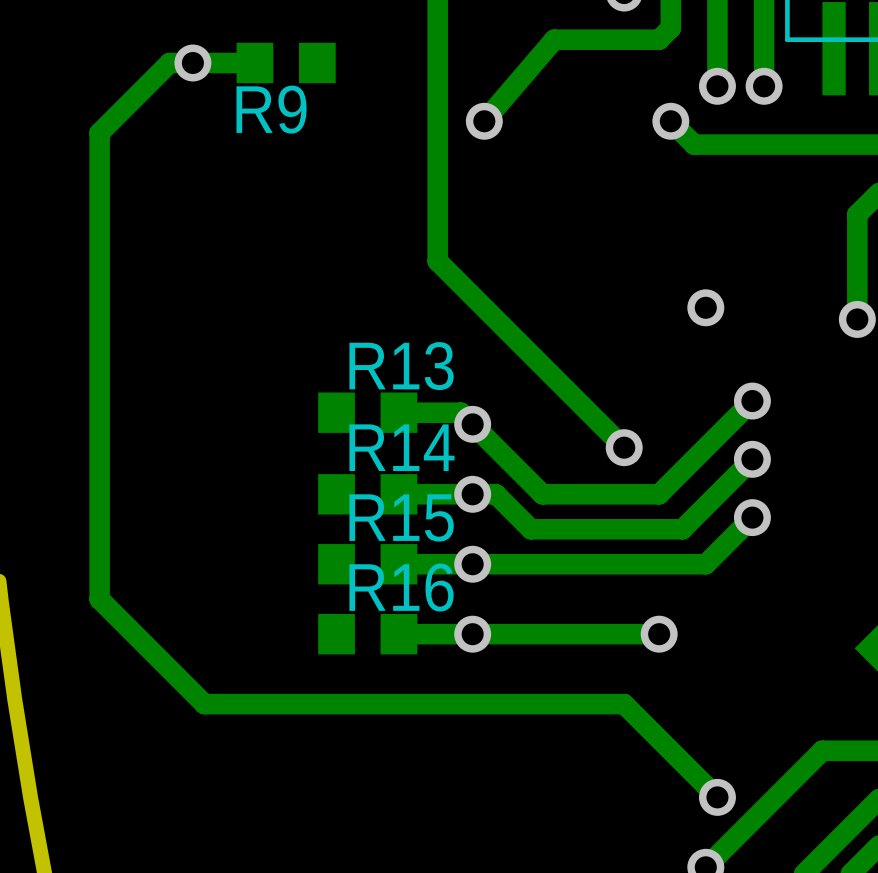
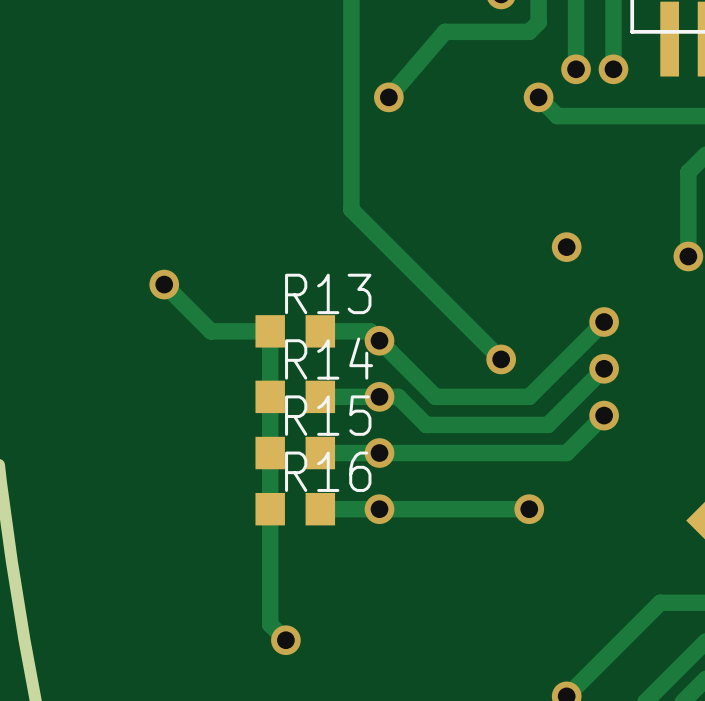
via: (192, 63) -> none
track: (254, 63) (169, 63) (99, 132) (99, 599) (204, 704) (624, 704) (717, 797) -> none
R9: (286, 63) -> none
track: none -> (164, 284) (211, 331) (270, 331) (270, 624) (285, 640)
via: none -> (164, 284)
via: none -> (285, 640)
via: (717, 797) -> none

